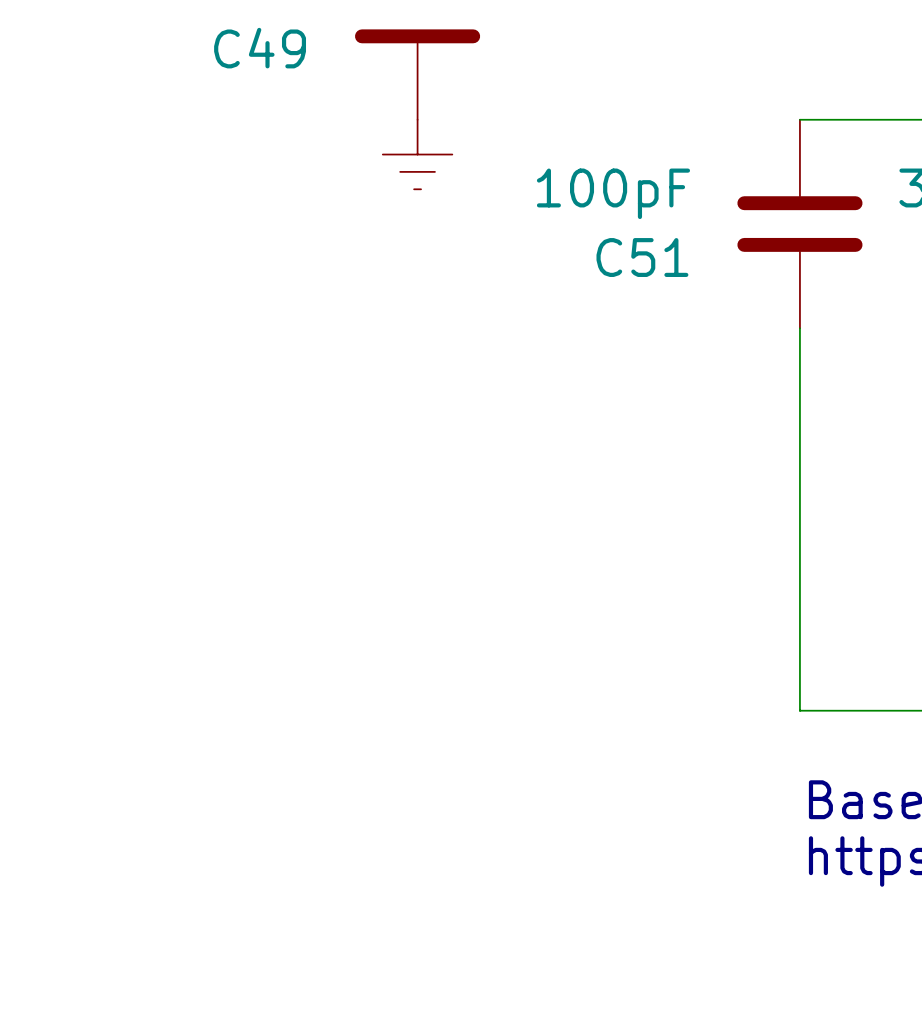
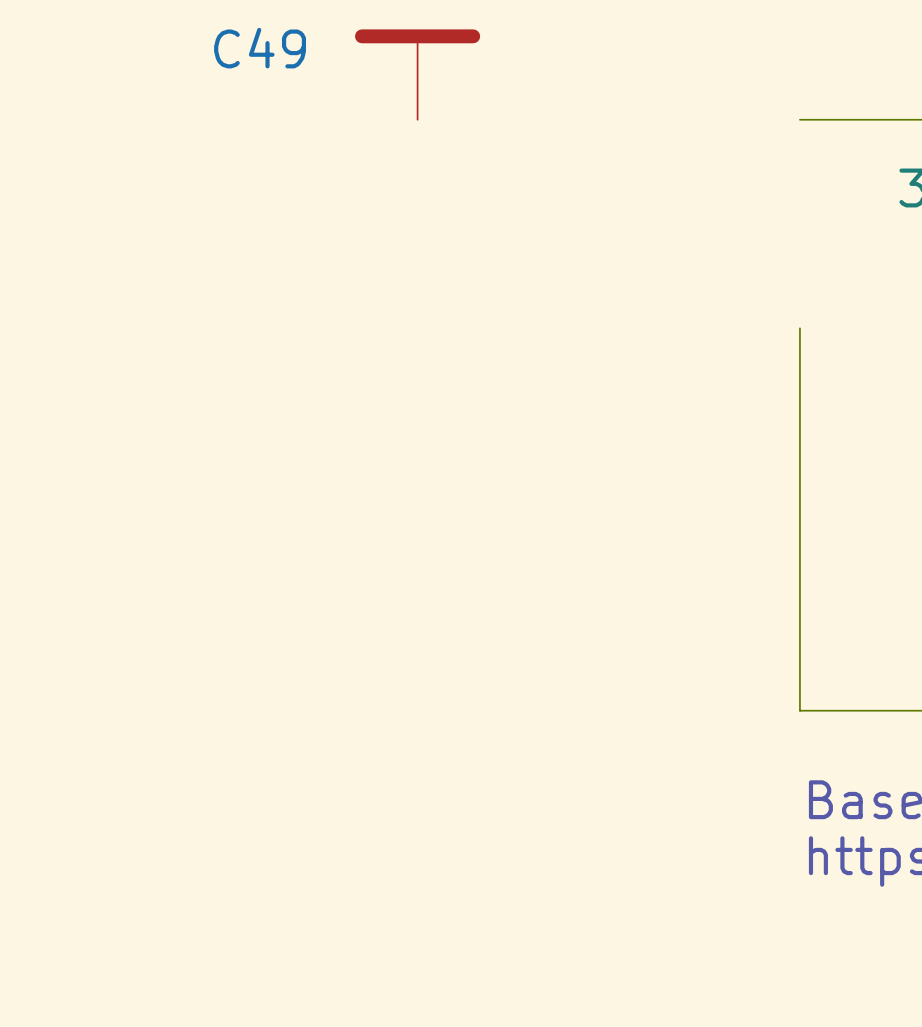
power symbol: (417, 154) -> none
C51: 100pF (799, 224) -> none

